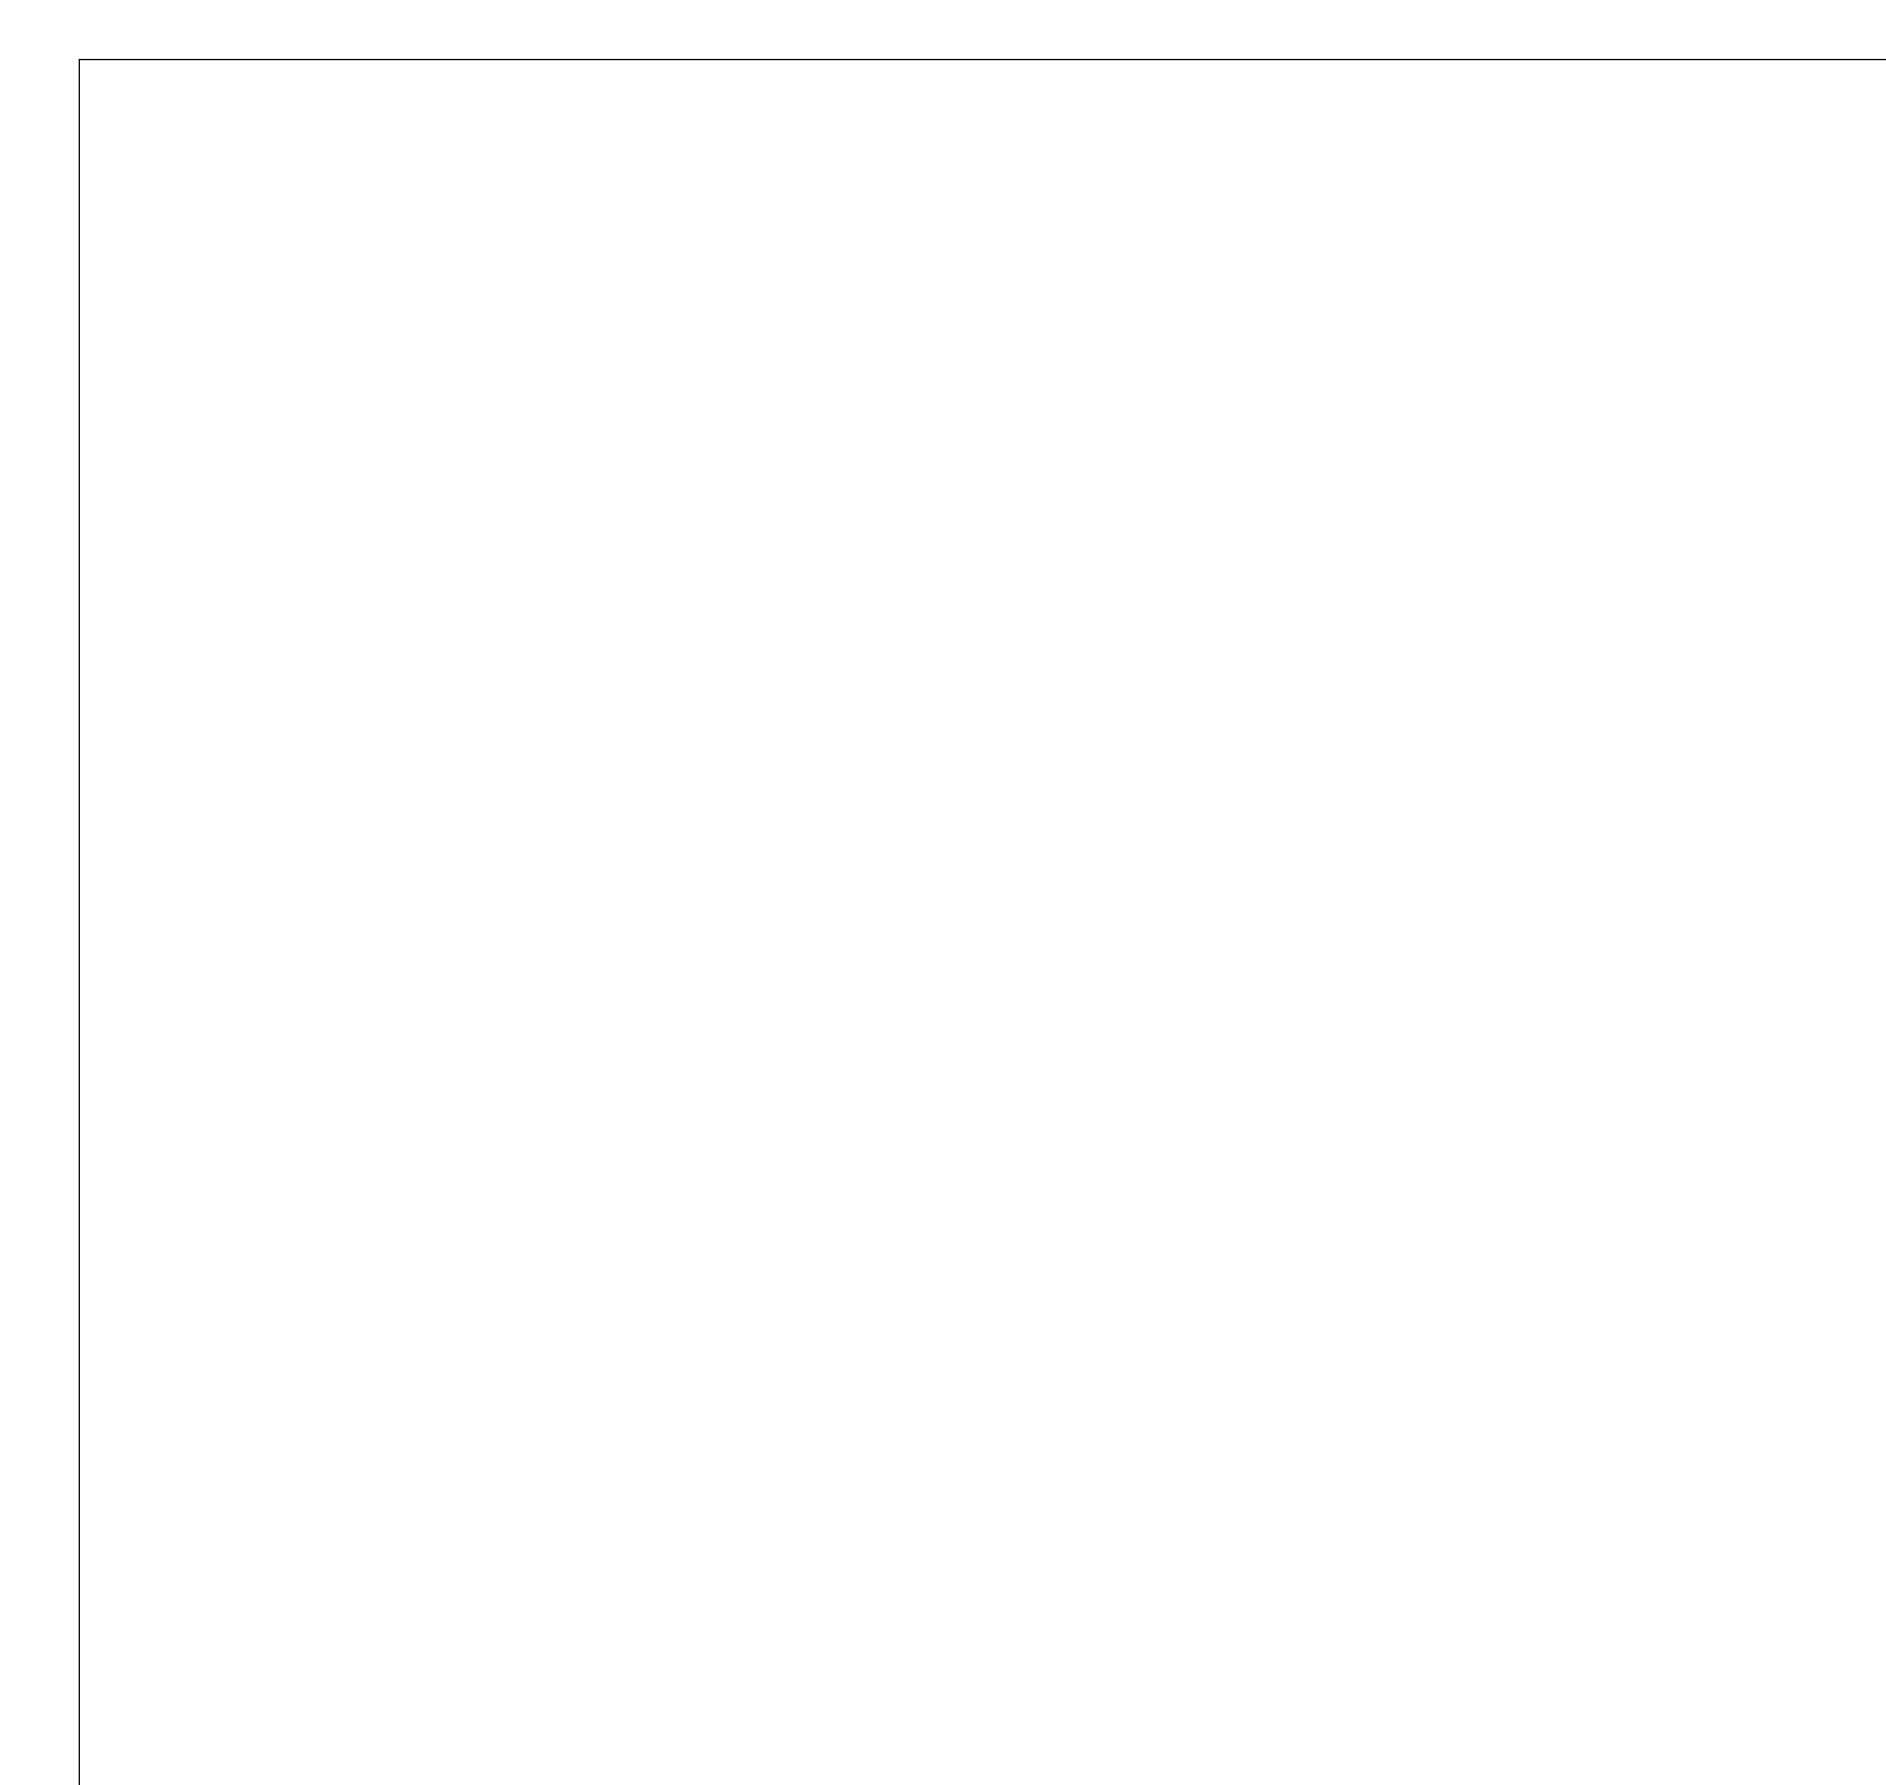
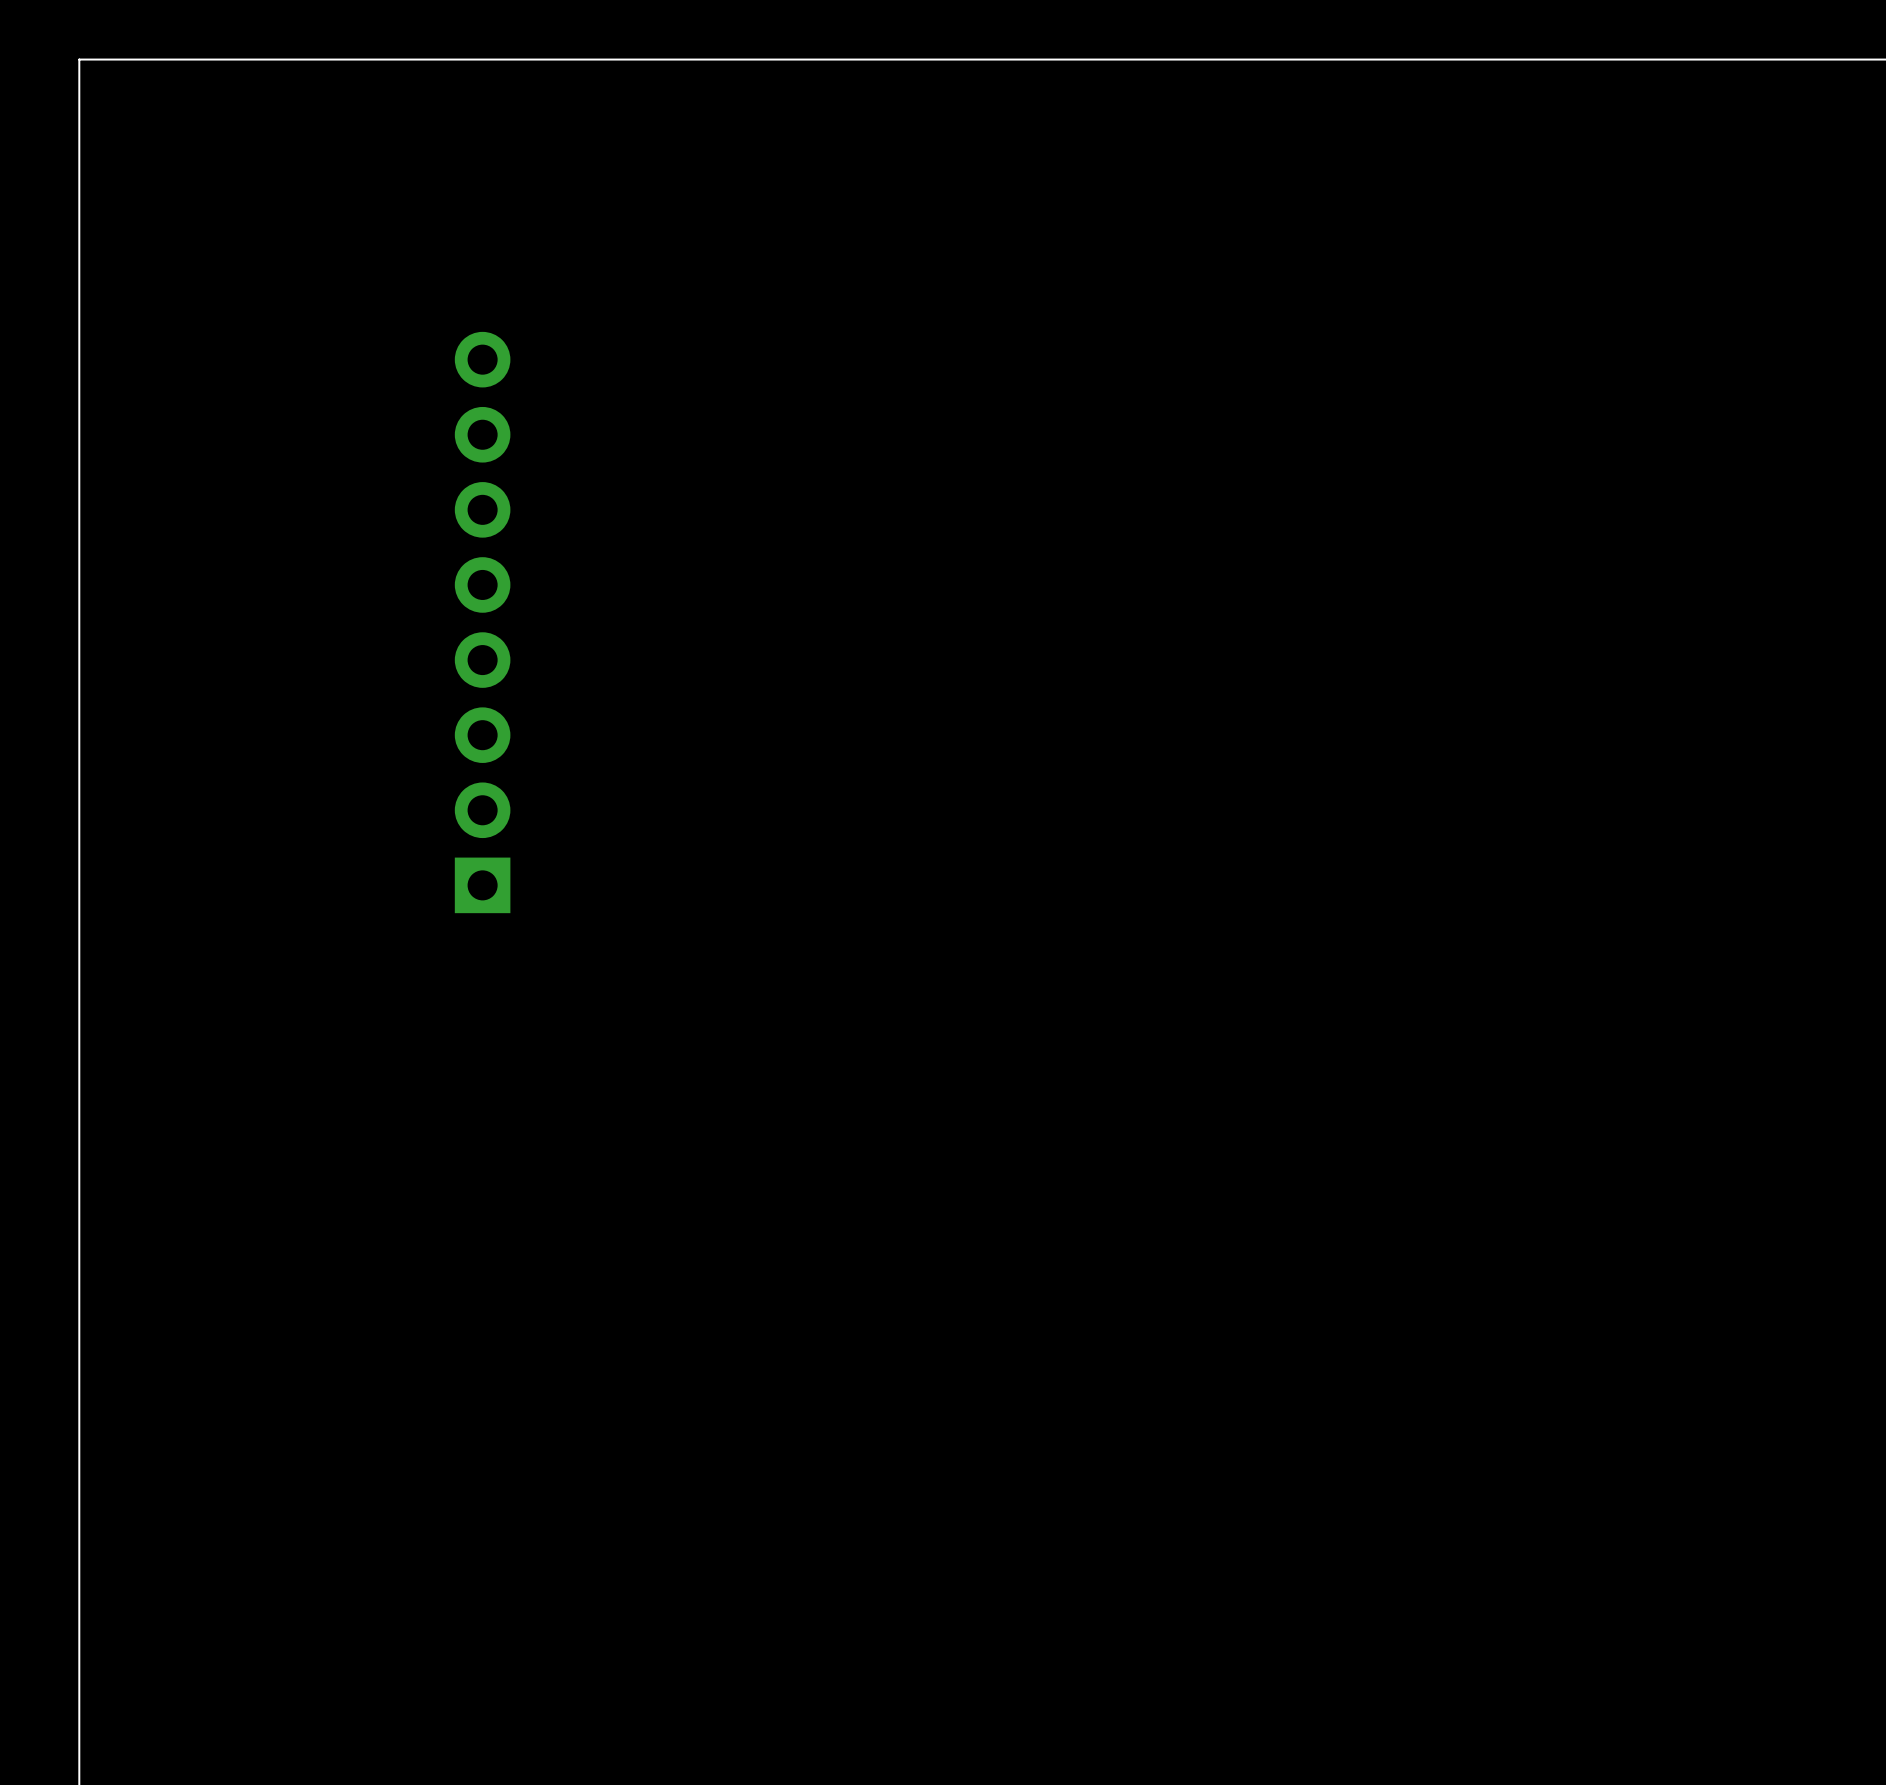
part: none -> (482, 622)

